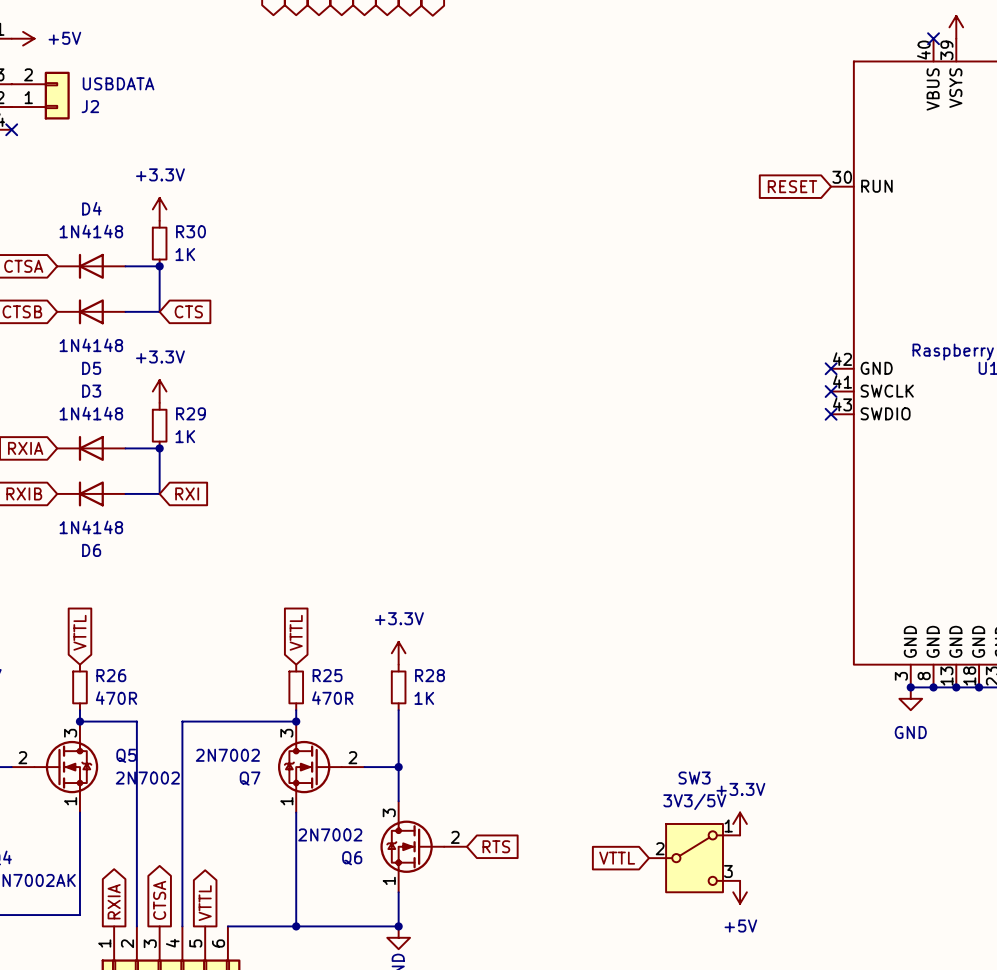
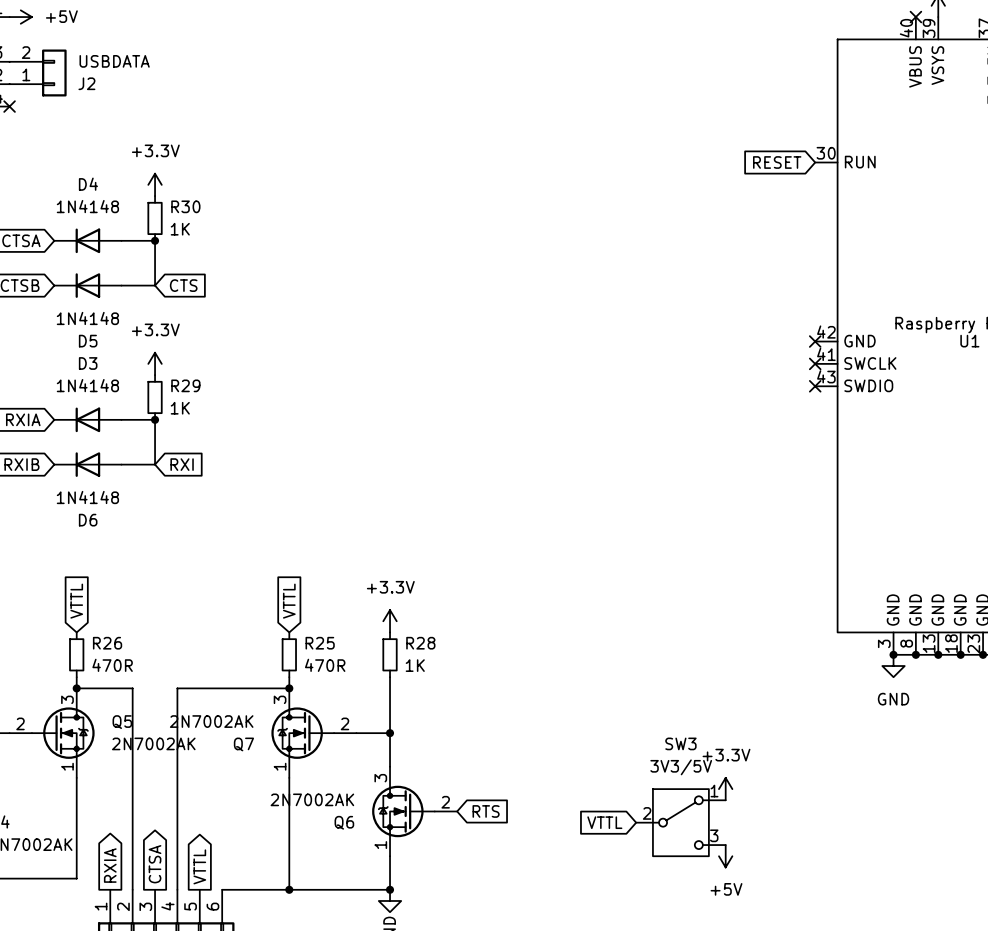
Q7 value: 2N7002 (227, 755) -> 2N7002AK (211, 721)
Q5 value: 2N7002 (147, 778) -> 2N7002AK (153, 743)
Q6 value: 2N7002 (330, 834) -> 2N7002AK (312, 799)

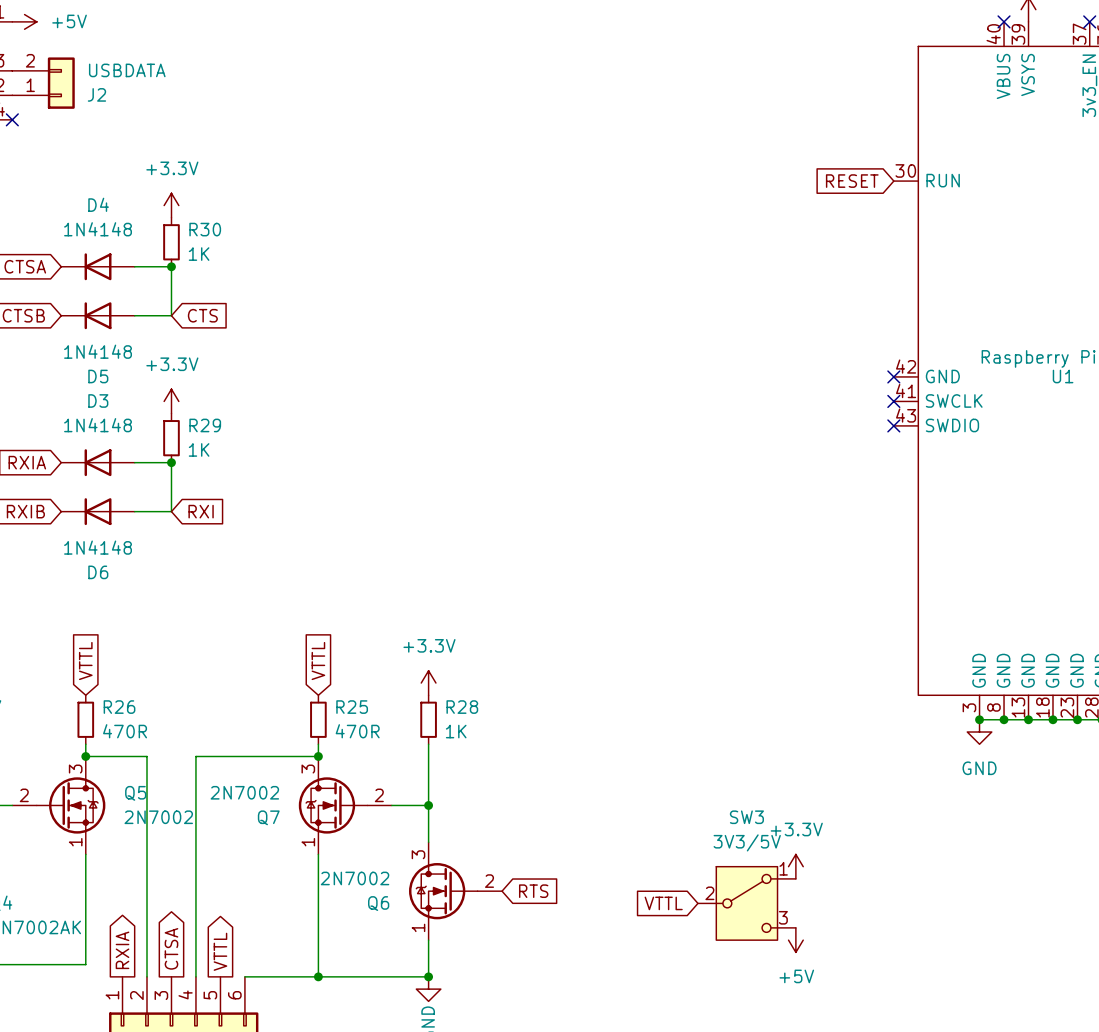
Q7 value: 2N7002AK (211, 721) -> 2N7002 (244, 792)
Q5 value: 2N7002AK (153, 743) -> 2N7002 (158, 817)
Q6 value: 2N7002AK (312, 799) -> 2N7002 (355, 878)

